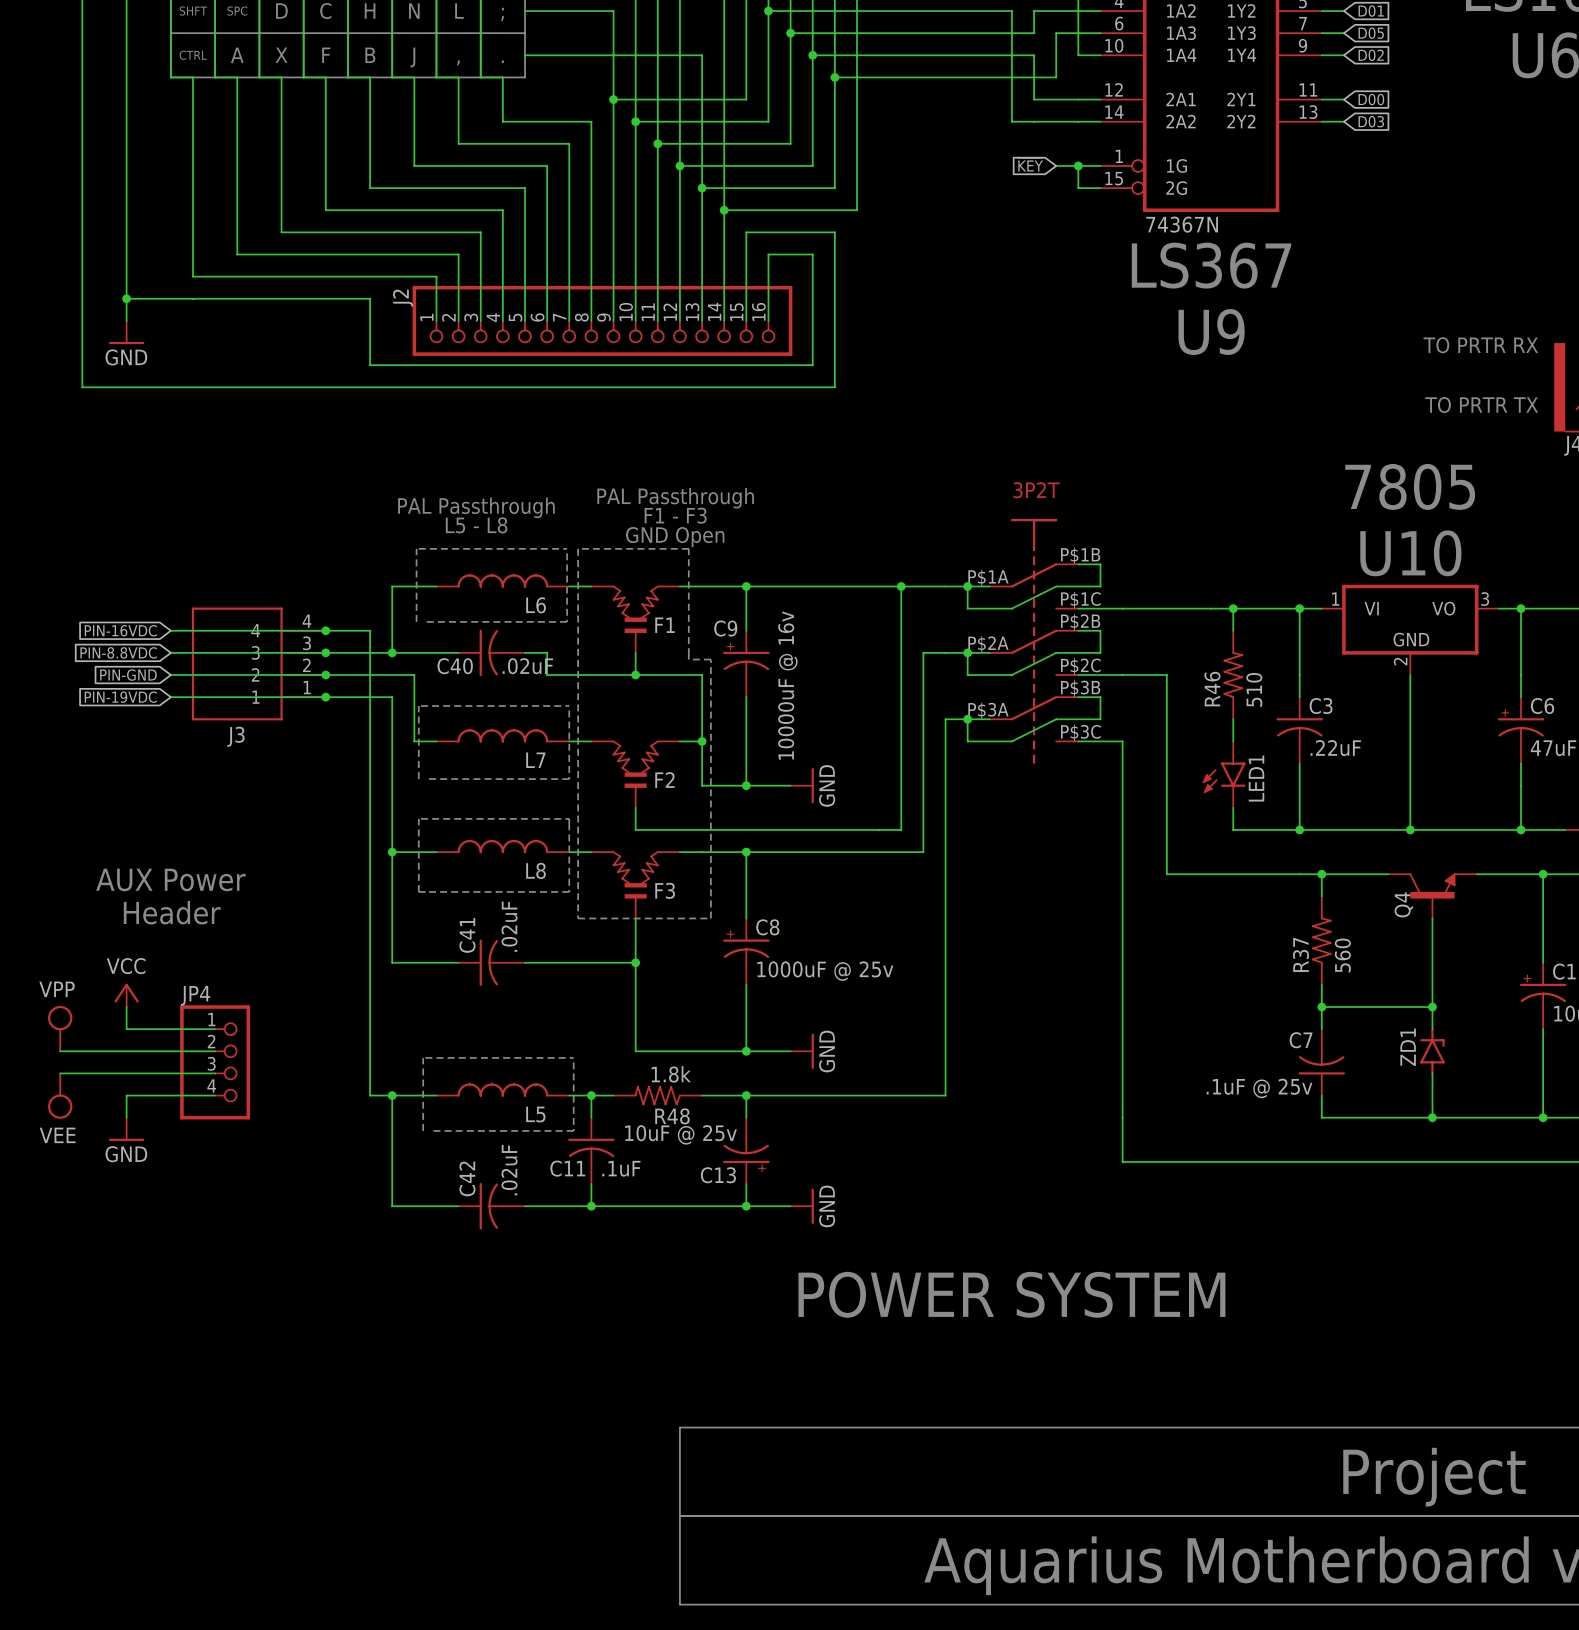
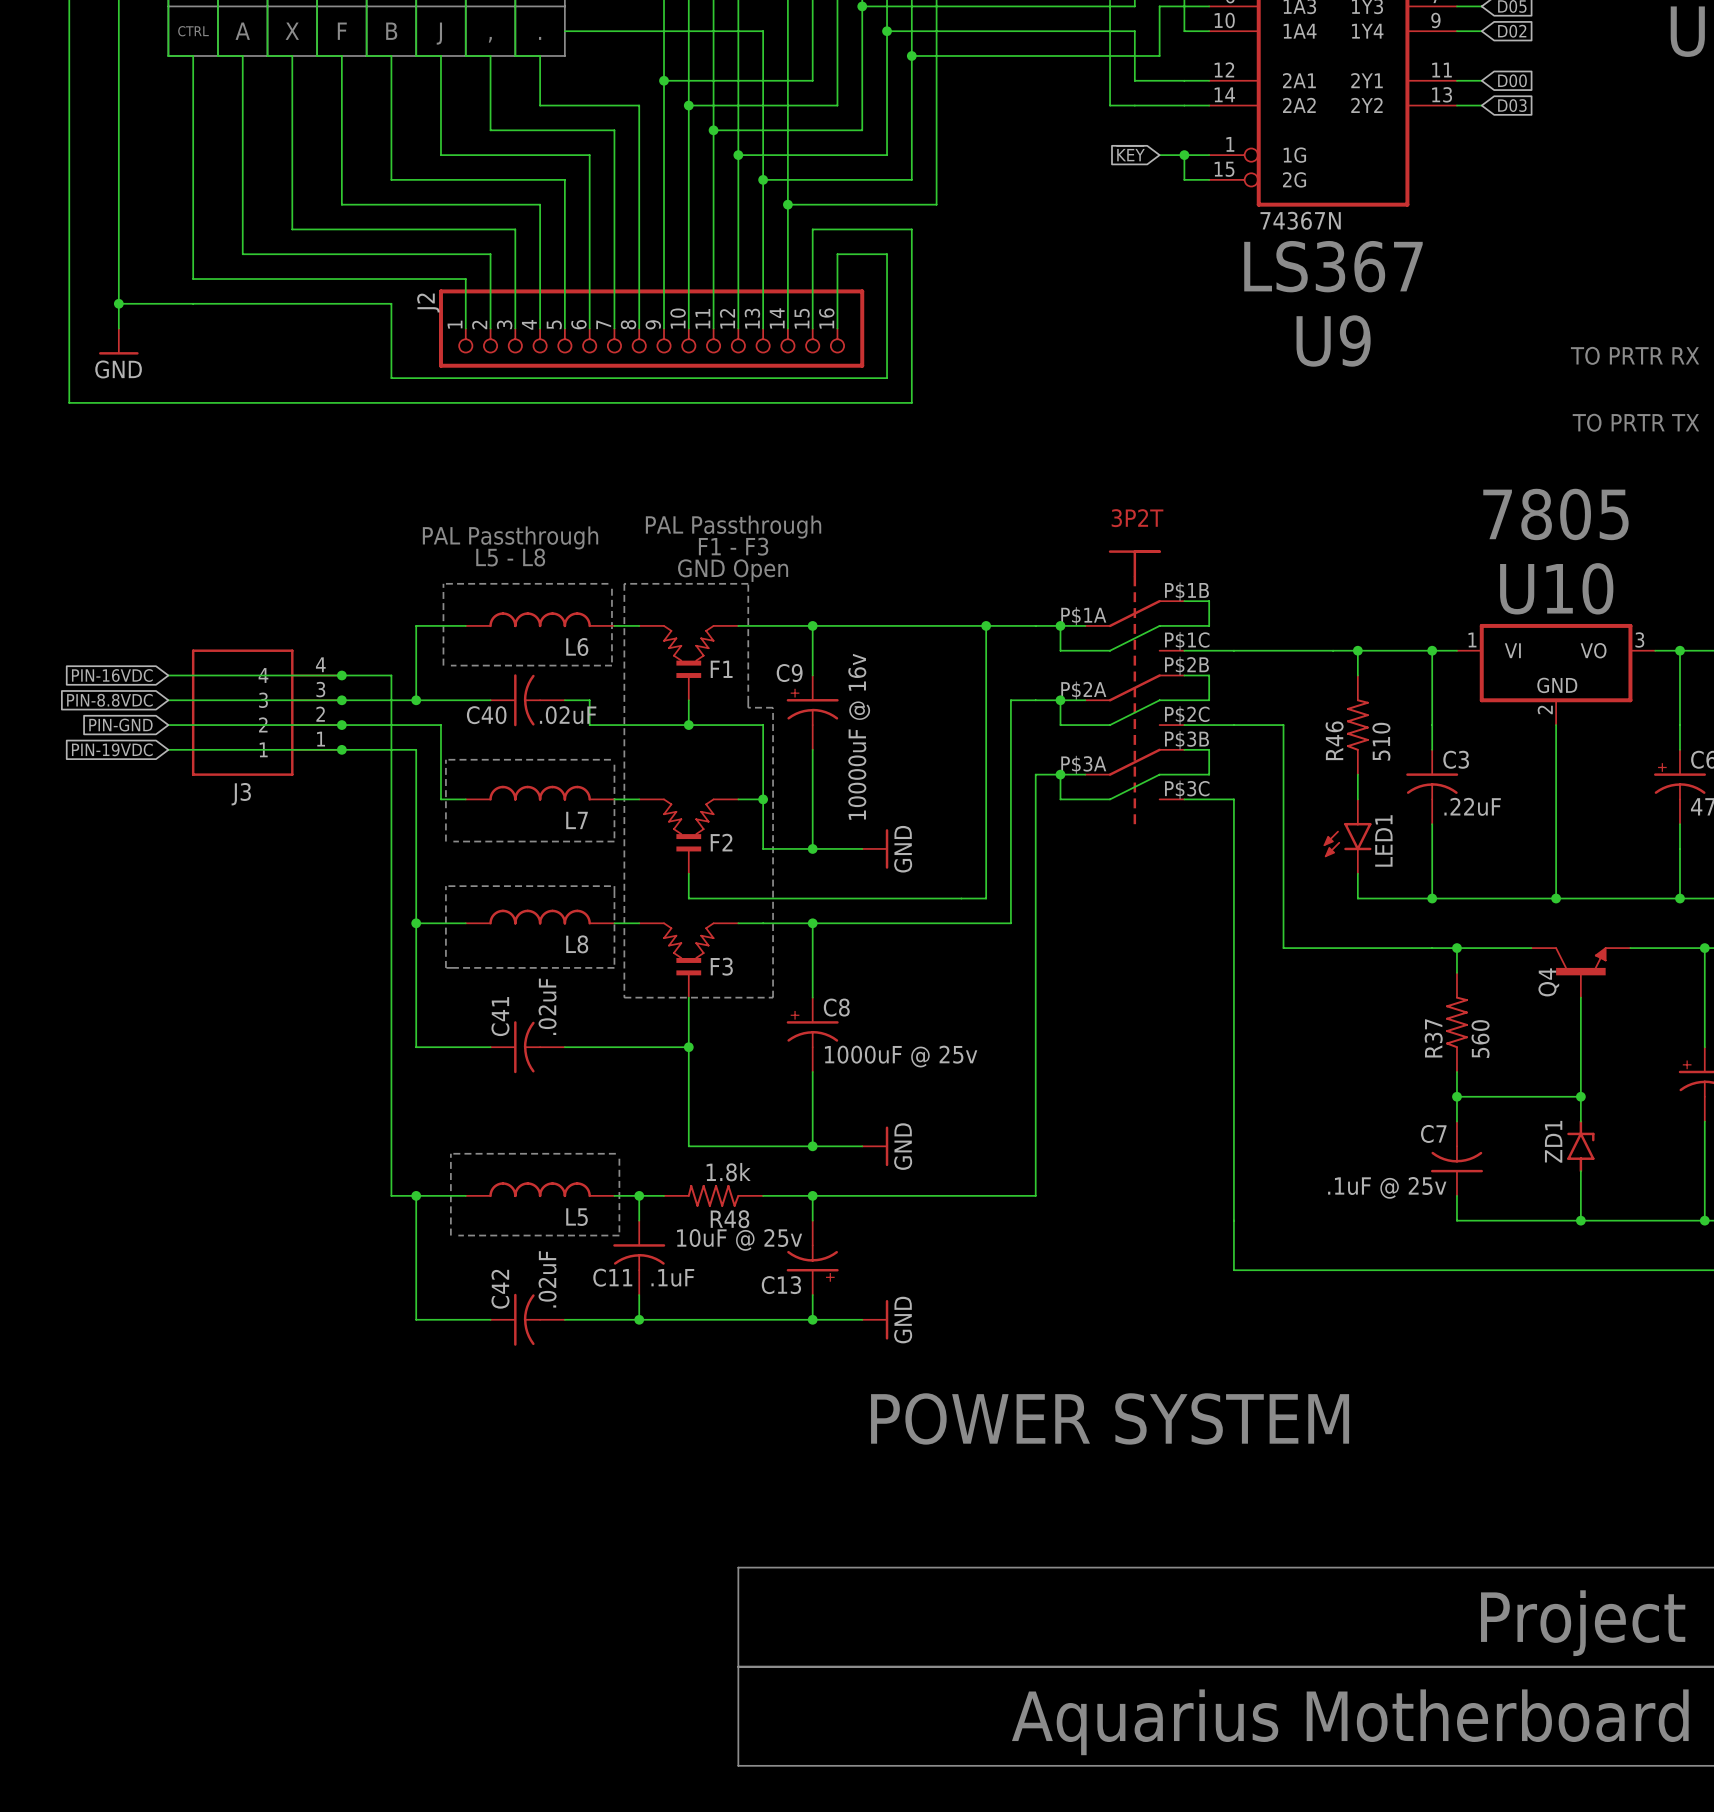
text: AUX Power (170, 879) -> none
text: Header (172, 912) -> none
power symbol: VCC (126, 995) -> none
wire: (126, 1007) (126, 1029) (215, 1029) -> none
power symbol: VPP (60, 1028) -> none
wire: (60, 1051) (215, 1051) -> none
JP4: (215, 1062) -> none
wire: (60, 1073) (215, 1073) -> none
wire: (215, 1095) (126, 1095) (126, 1117) -> none
power symbol: VEE (60, 1096) -> none
power symbol: GND (126, 1129) -> none

